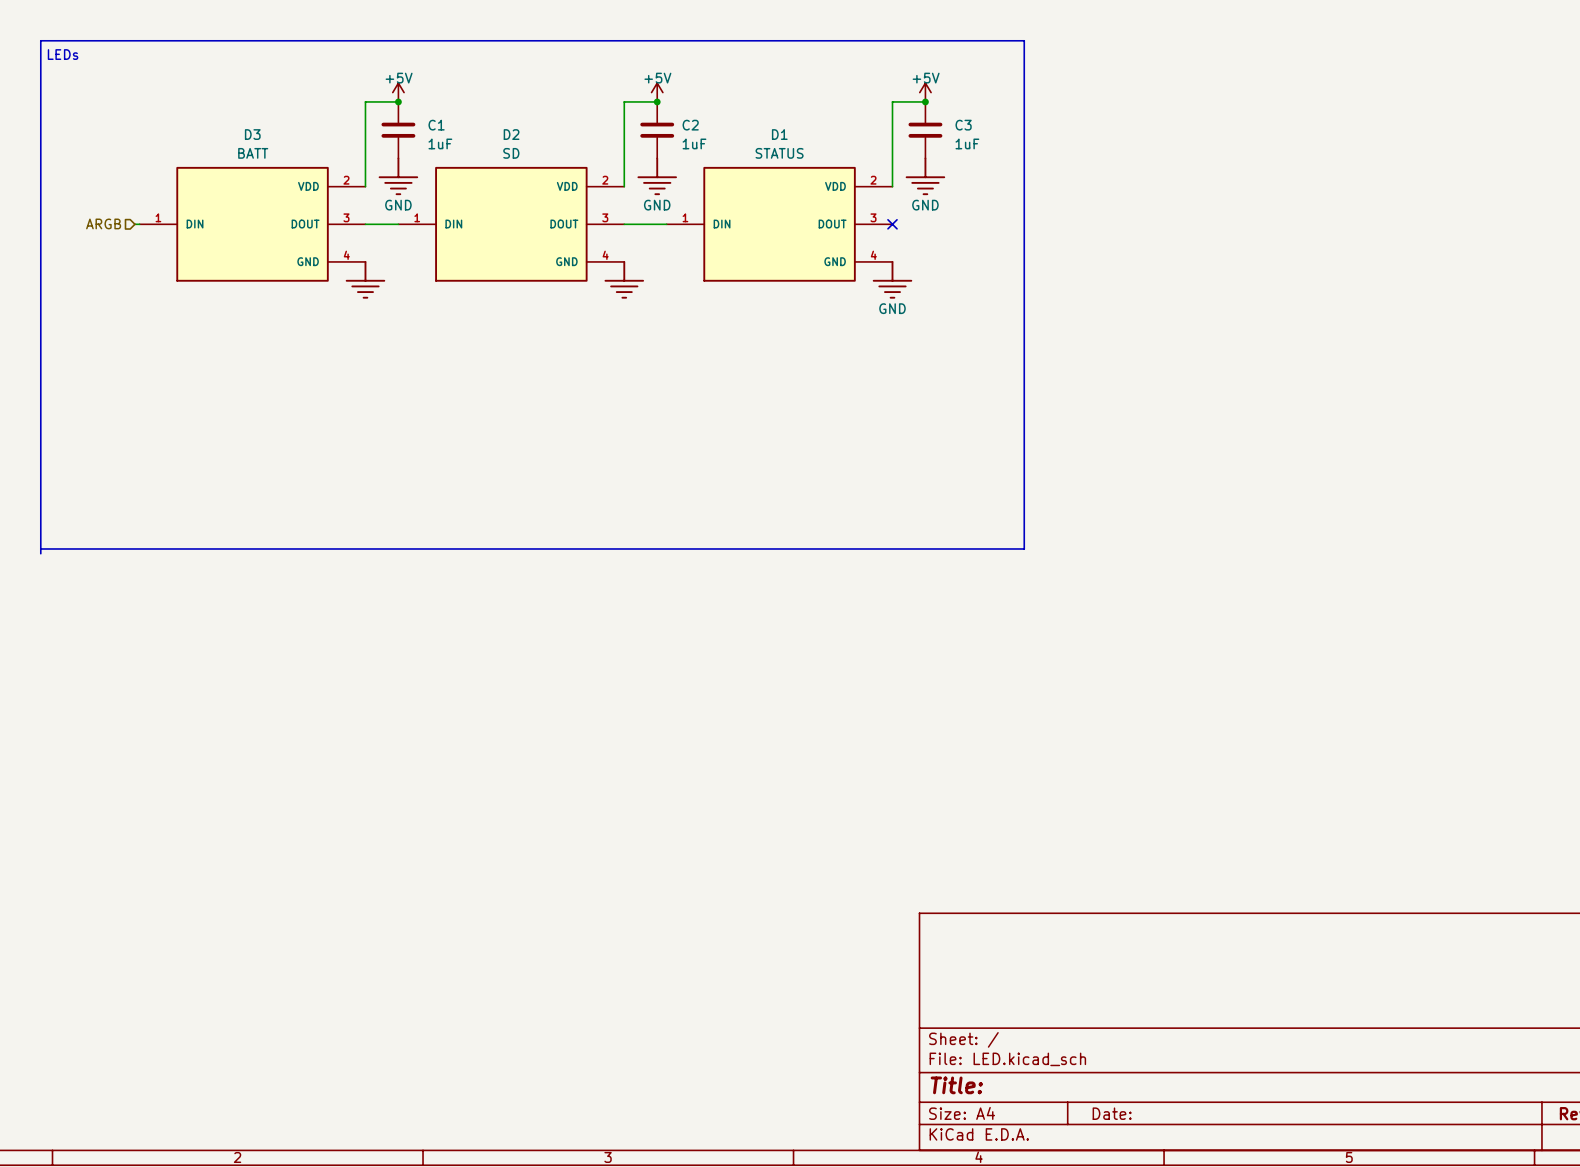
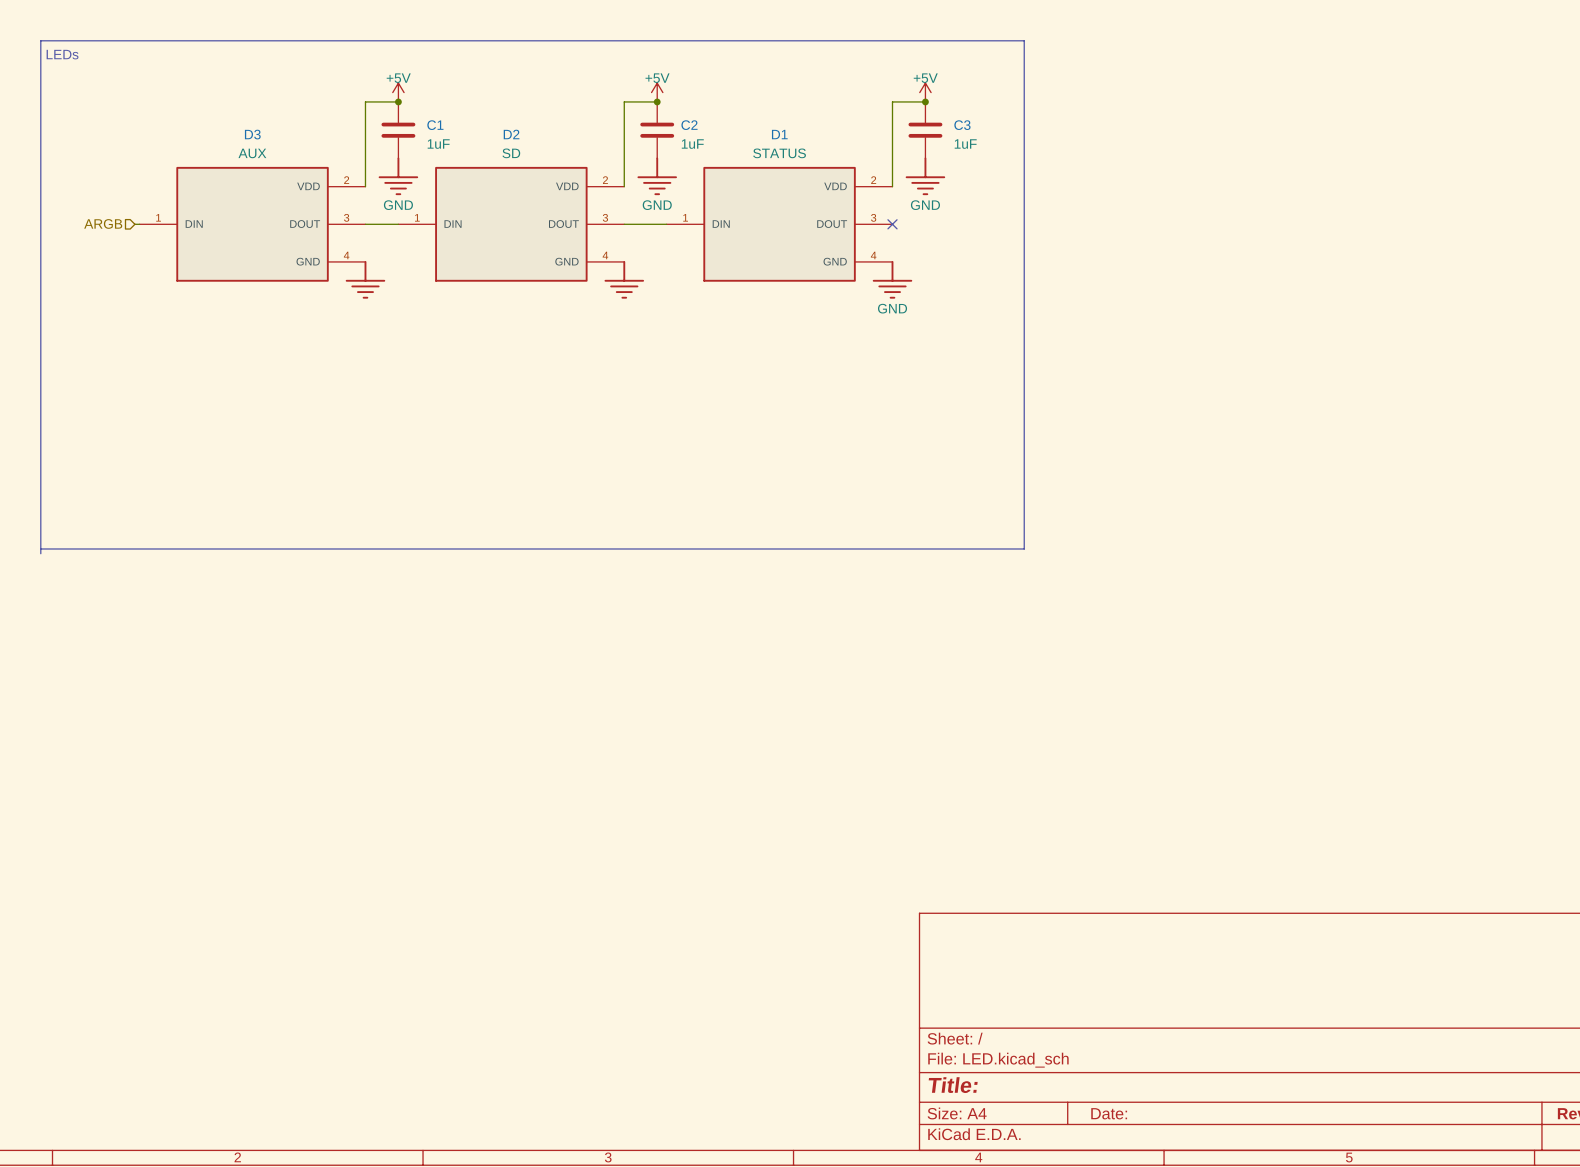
D3 value: BATT (253, 153) -> AUX (252, 153)

